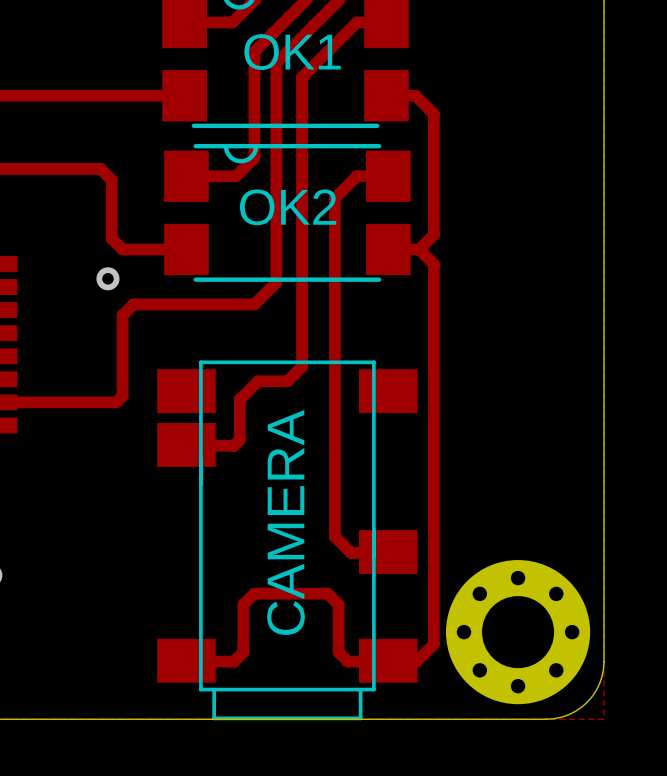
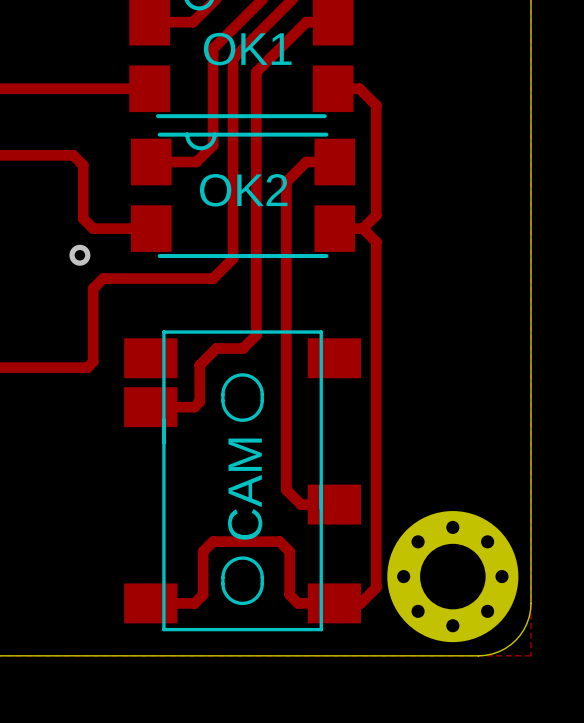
part footprint: [157, 360, 418, 721] -> [124, 330, 362, 632]
part value: CAMERA (286, 522) -> CAM (245, 489)

